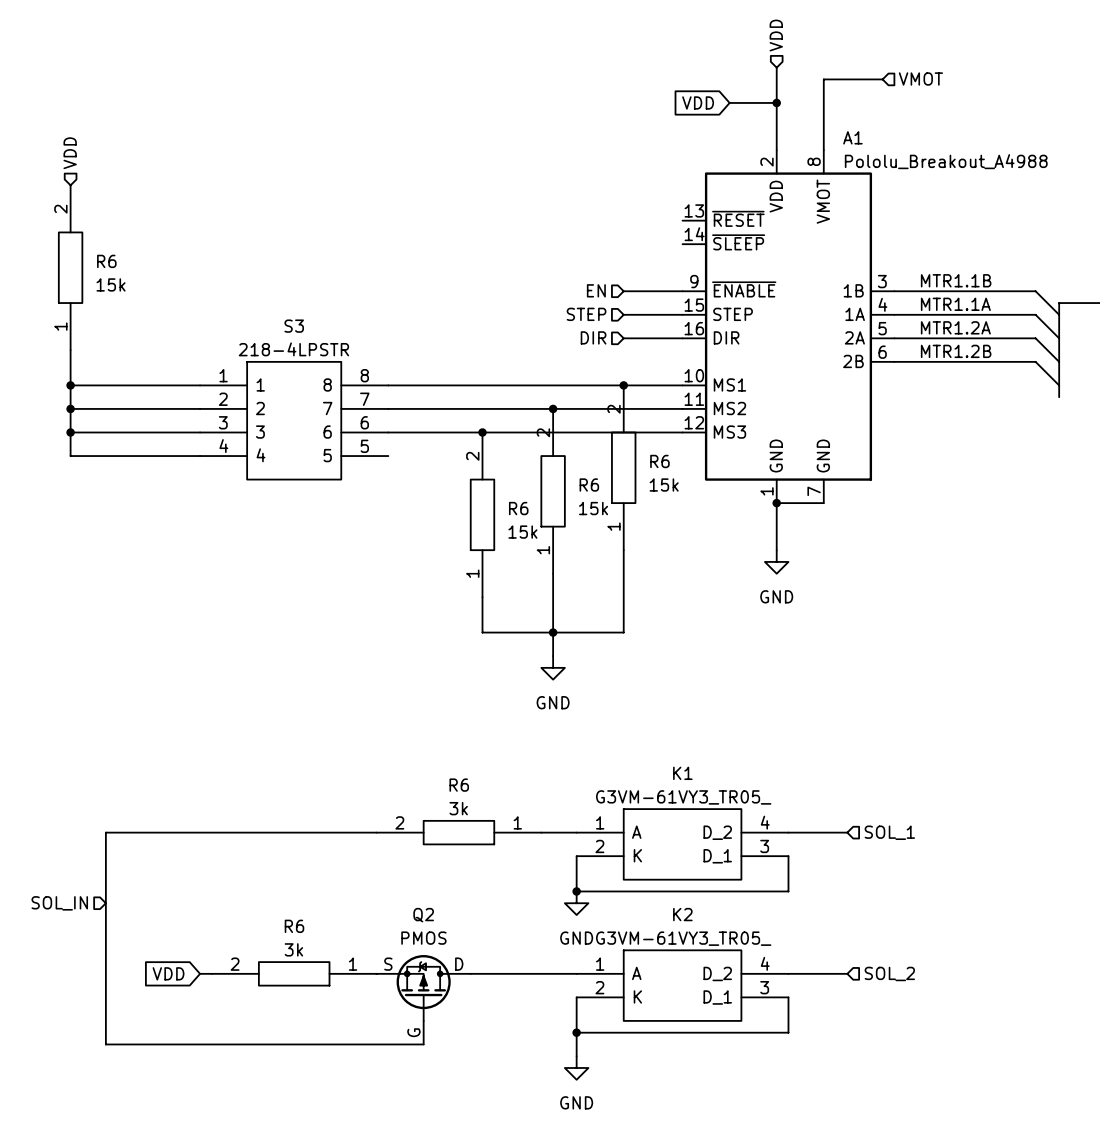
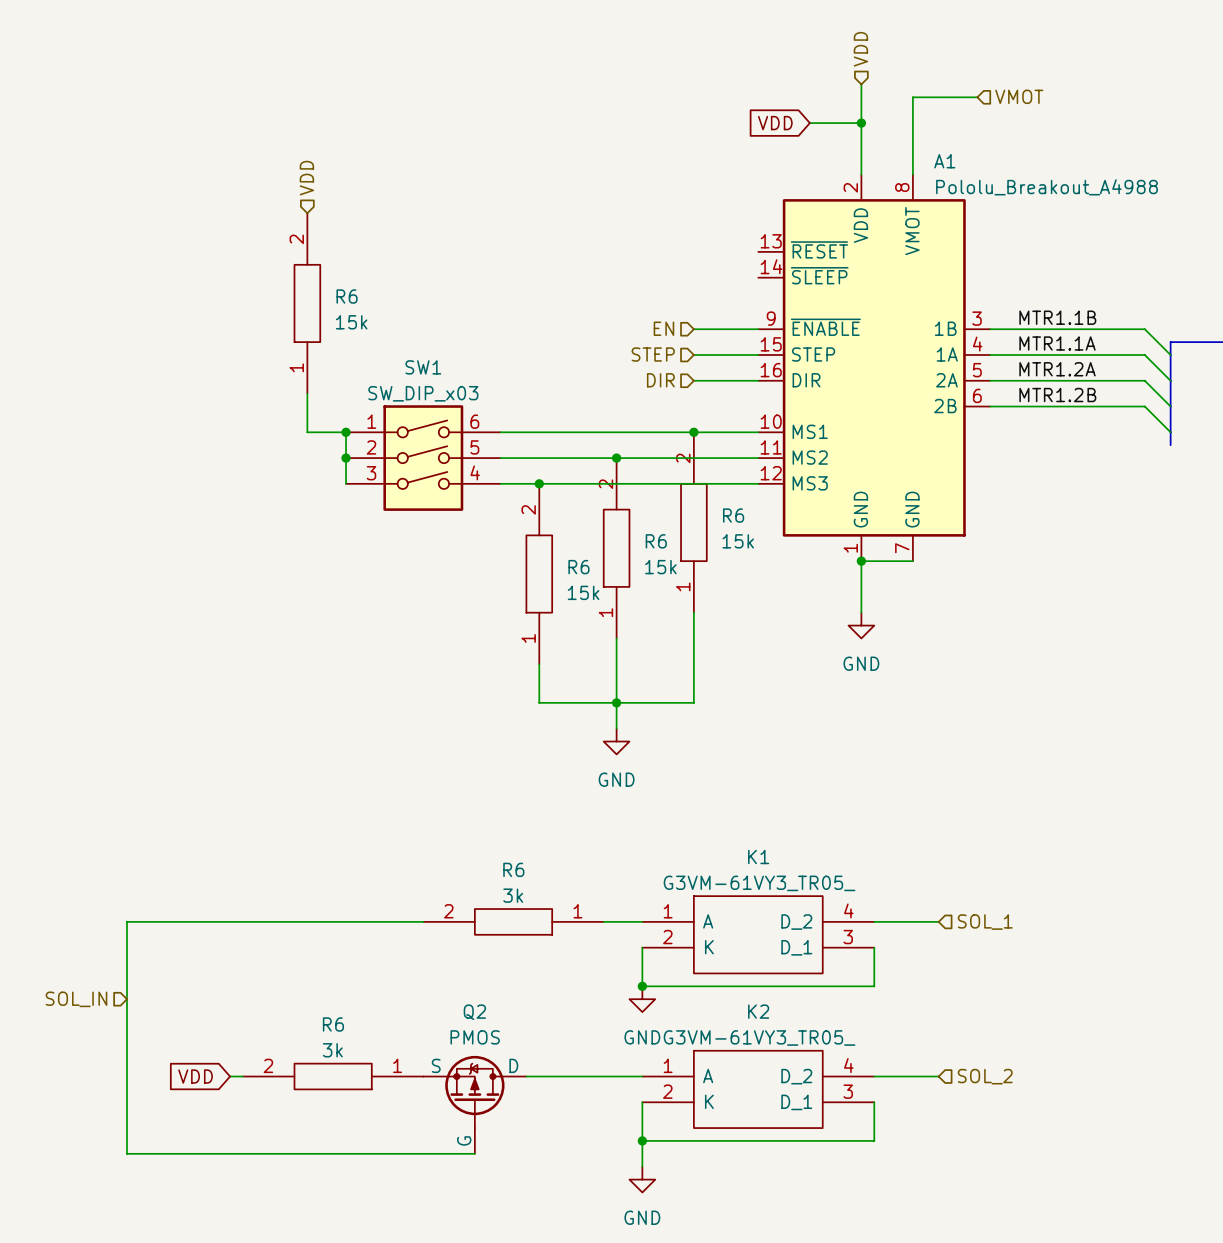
hierarchical label position: VDD (70, 153) -> VDD (306, 178)
R6 position: (70, 267) -> (307, 303)
wire: (70, 350) (70, 456) (200, 456) -> none
wire: none -> (307, 393) (307, 432) (346, 432) (346, 483)
wire: (70, 385) (200, 385) -> none
junction: (70, 385) -> none
junction: none -> (346, 432)
wire: (70, 408) (200, 408) -> none
junction: (70, 408) -> none
junction: none -> (346, 458)
SW1: none -> SW_DIP_x03 (423, 458)
S3: 218-4LPSTR (294, 420) -> none
wire: (70, 432) (200, 432) -> none
junction: (70, 432) -> none

